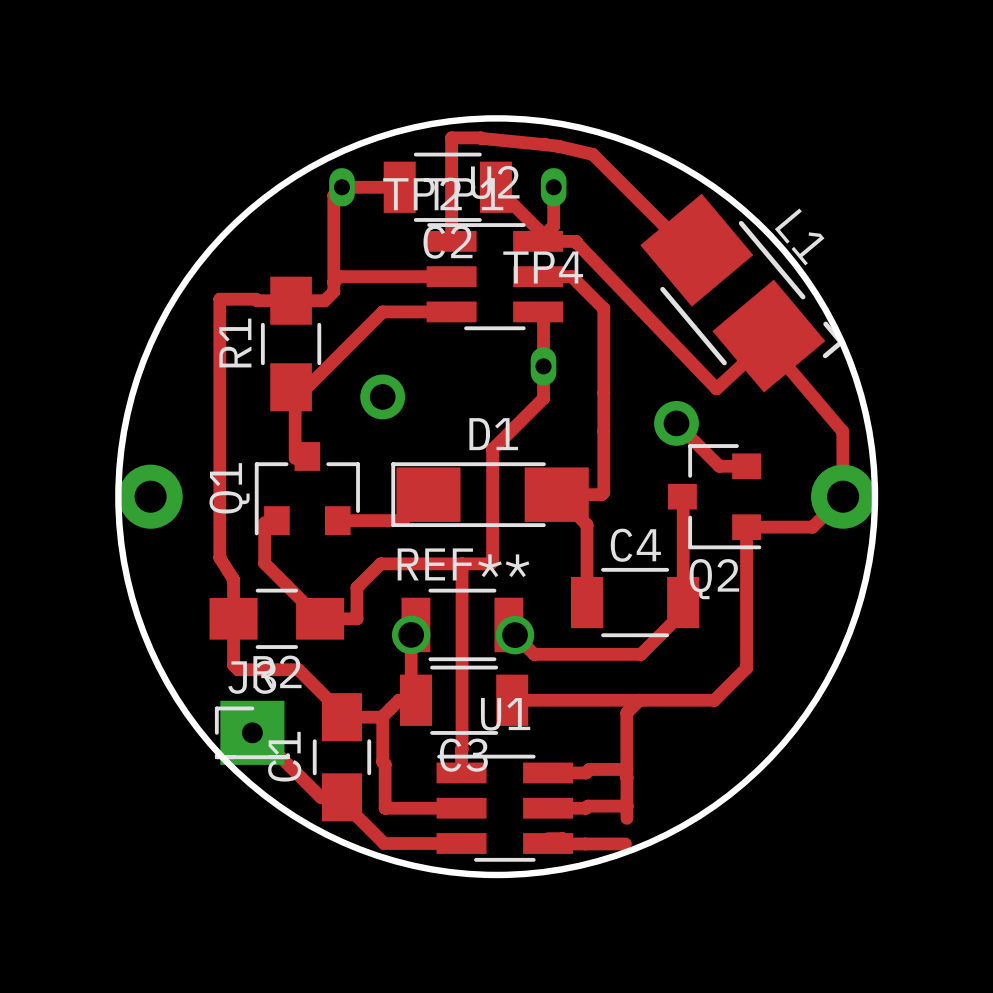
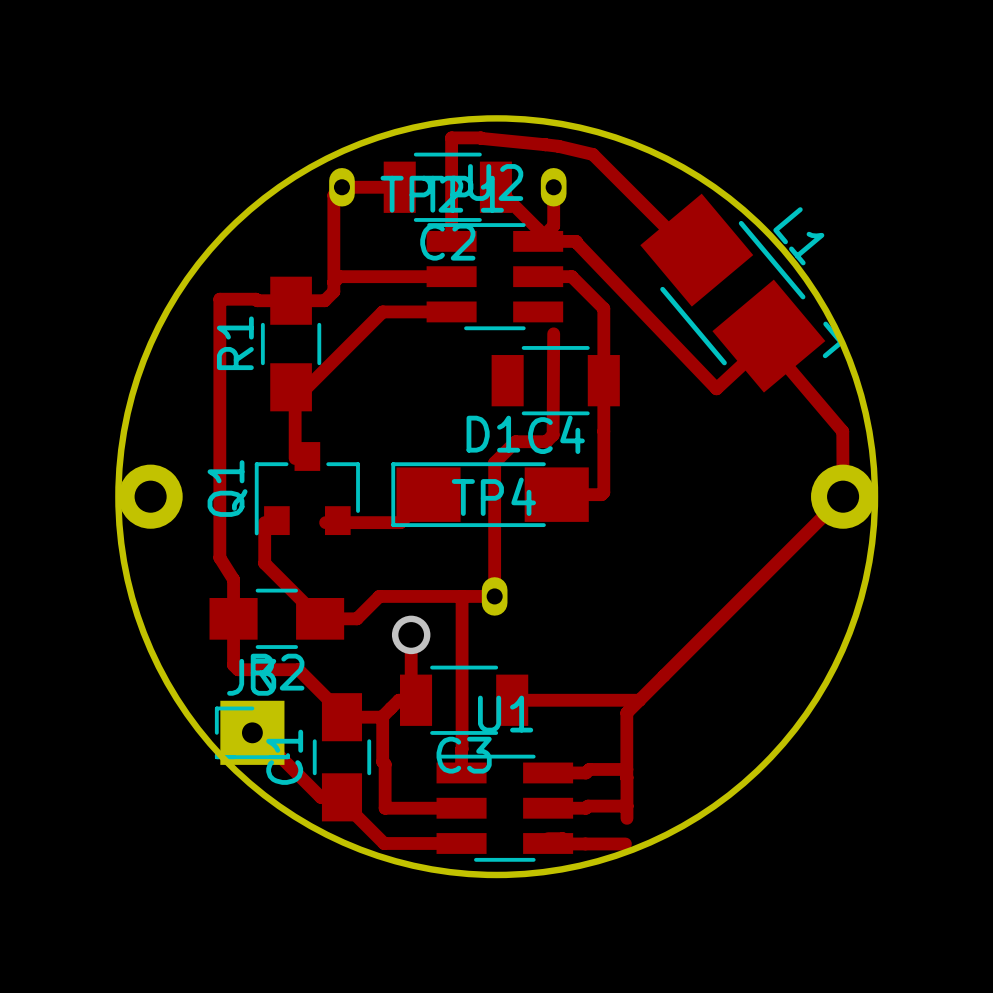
track: (538, 311) (543, 317) (543, 398) (492, 449) (492, 561) (490, 563) (380, 563) (356, 587) (356, 618) -> (553, 333) (553, 435) (546, 441) (515, 441) (494, 462) (494, 594) (492, 596) (379, 596) (356, 618)
TP4 position: (543, 366) -> (494, 596)
via: (382, 396) -> none
track: (676, 423) (719, 466) (746, 466) -> none
via: (676, 423) -> none
track: (556, 494) (587, 524) (587, 602) -> none
track: (682, 496) (683, 612) (641, 654) (534, 654) (515, 635) -> none
Q2: (714, 496) -> none
track: (337, 520) (402, 520) -> (325, 522) (400, 522) (402, 520)
track: (812, 527) (746, 527) (746, 668) (714, 700) (639, 700) -> (812, 527) (639, 700)
C4 name position: C4 (635, 545) -> C4 (556, 434)
track: (462, 563) (462, 596) -> none
C4 position: (635, 602) -> (555, 380)
REF**: (462, 624) -> none
via: (515, 635) -> none

